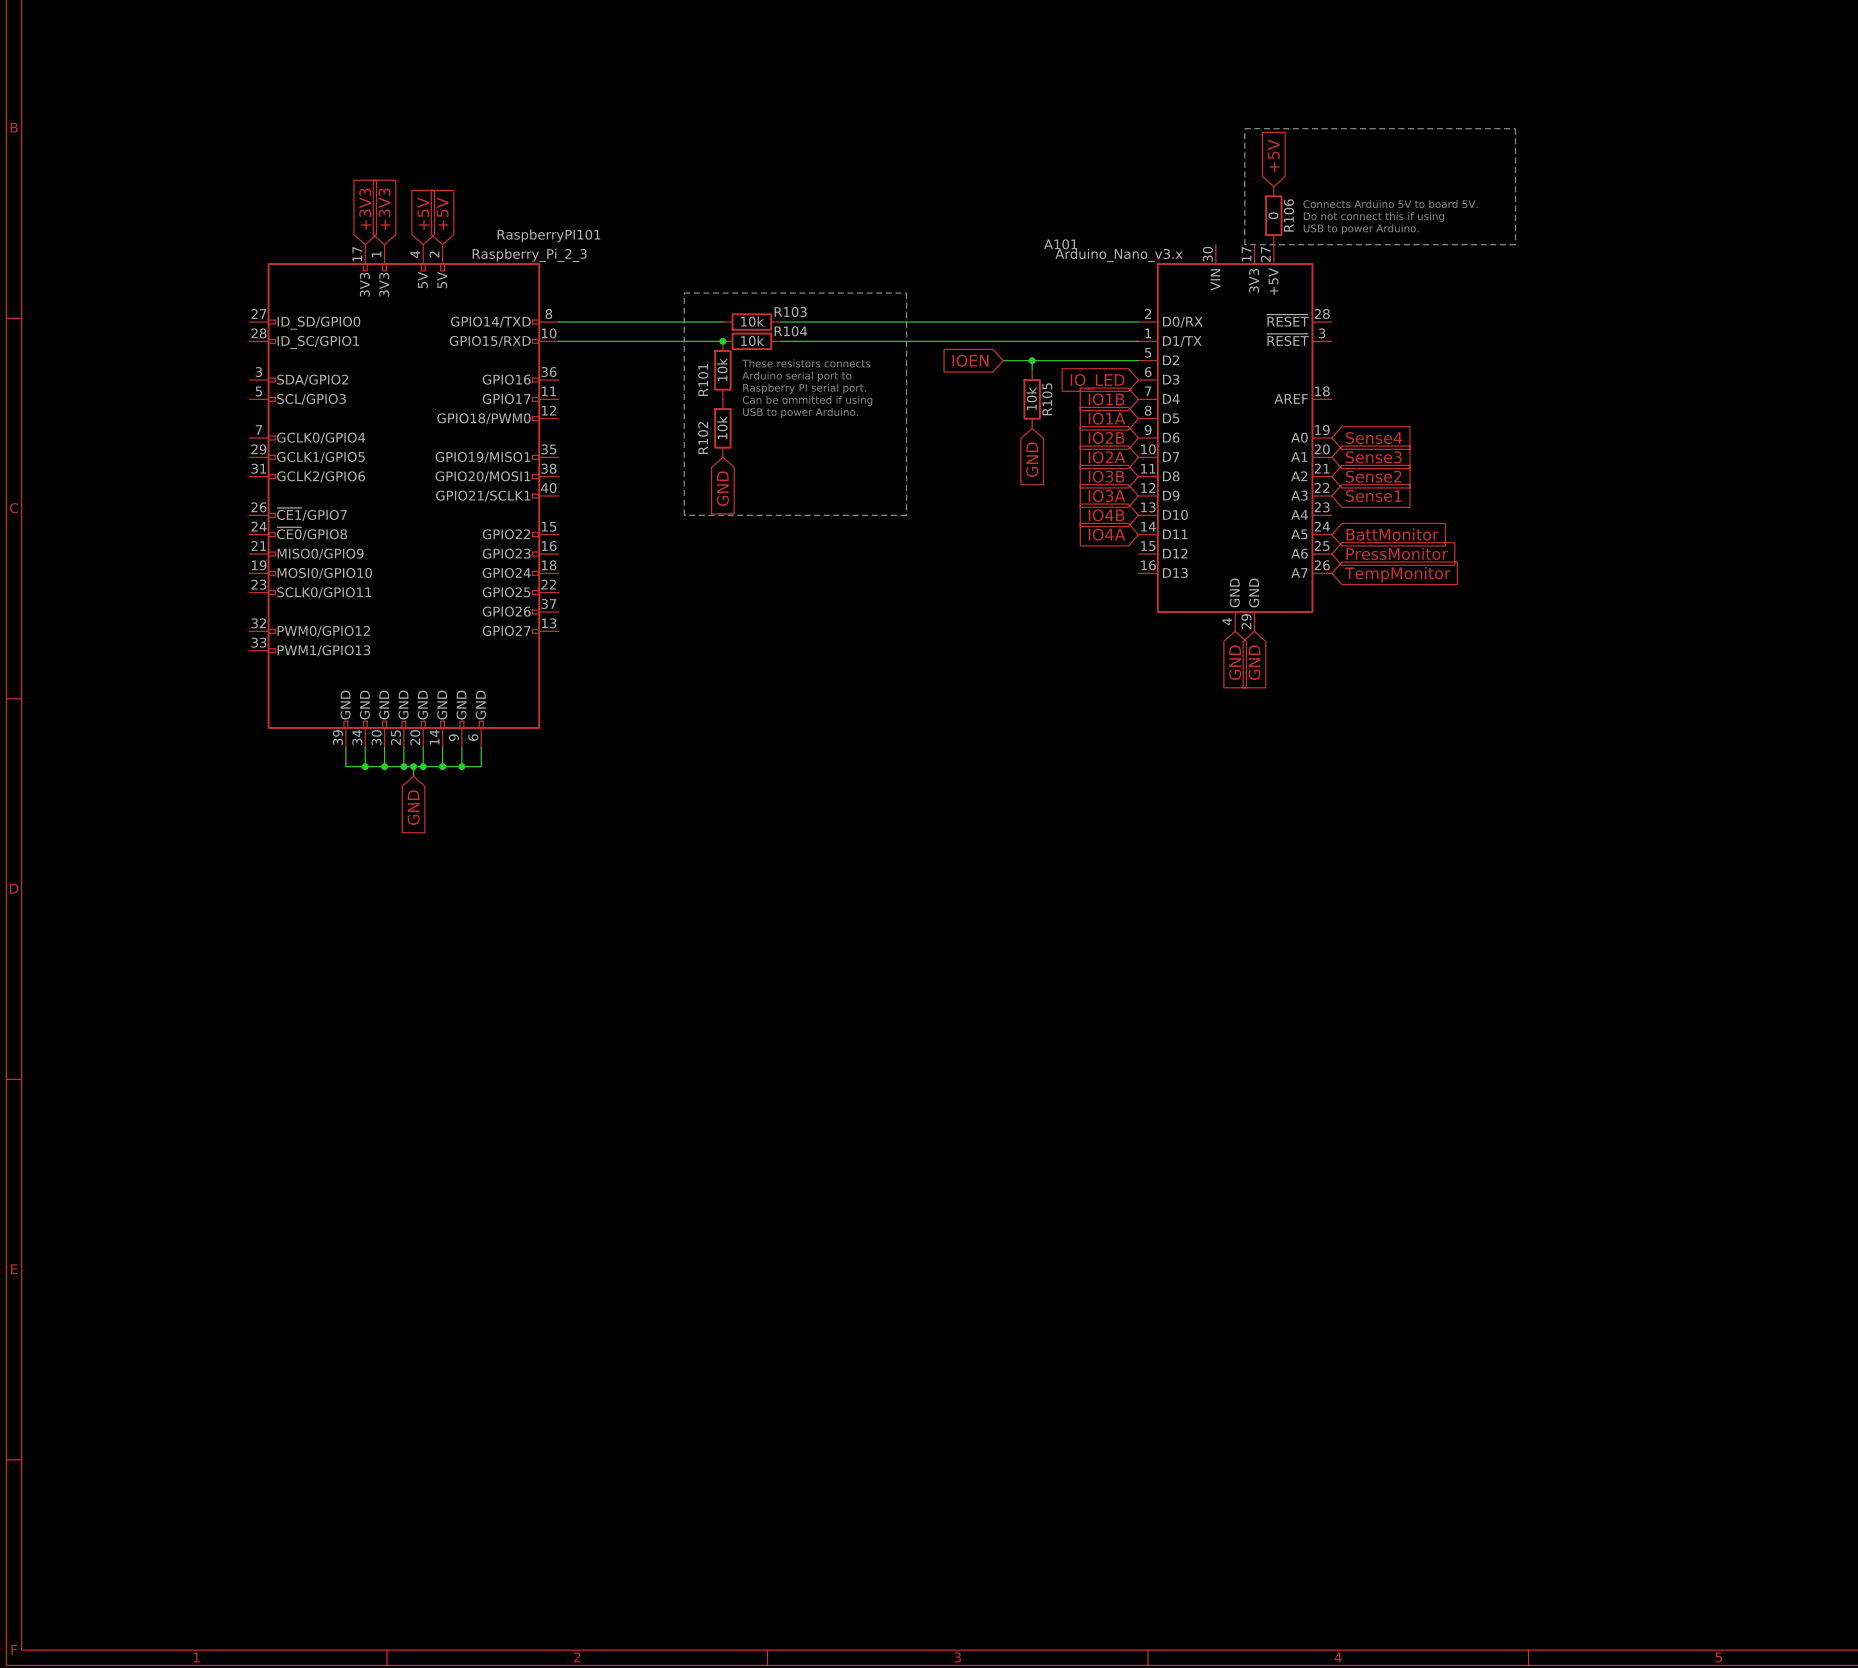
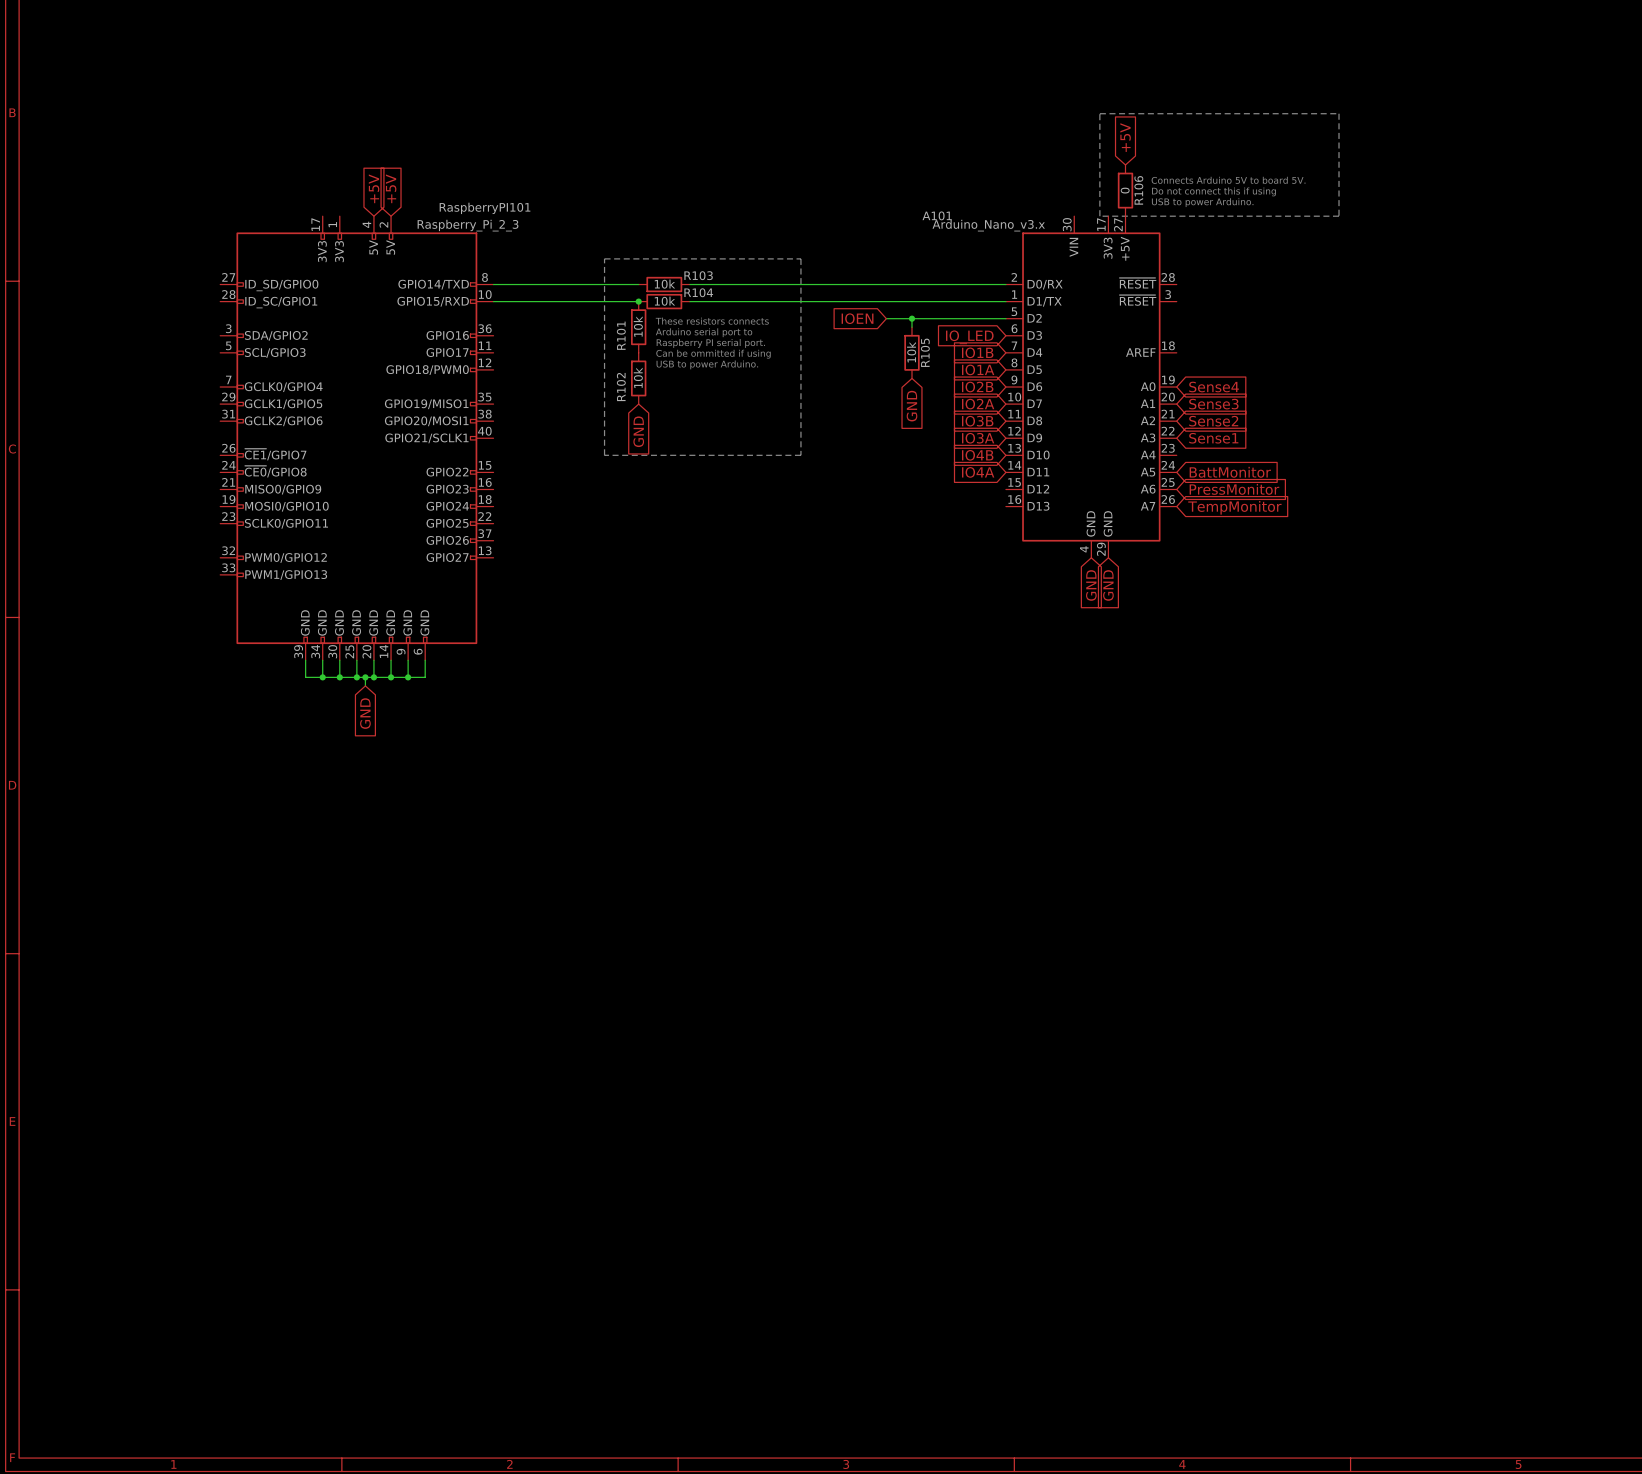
global label: +3V3 (365, 209) -> none
global label: +3V3 (384, 209) -> none

